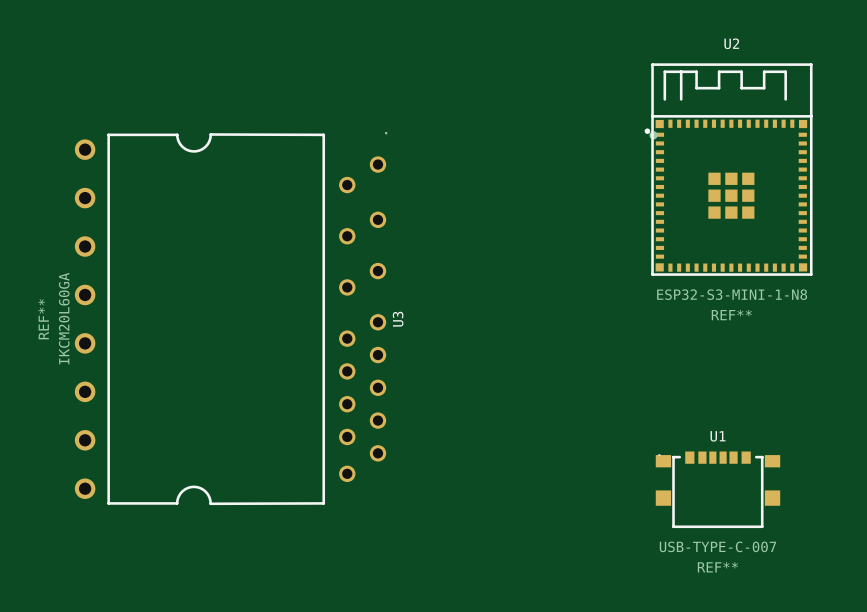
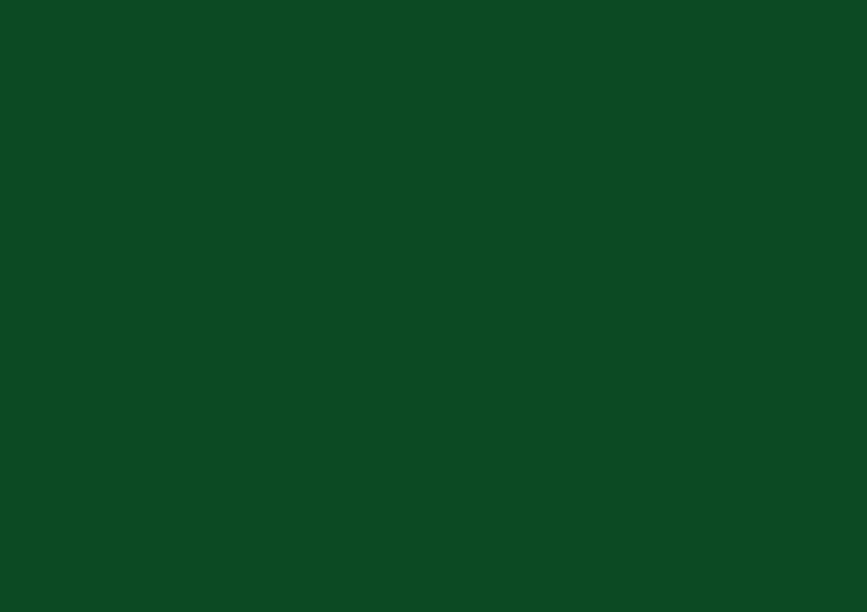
U2: ESP32-S3-MINI-1-N8 (728, 169) -> none
U3: IKCM20L60GA (230, 318) -> none
U1: USB-TYPE-C-007 (717, 489) -> none

